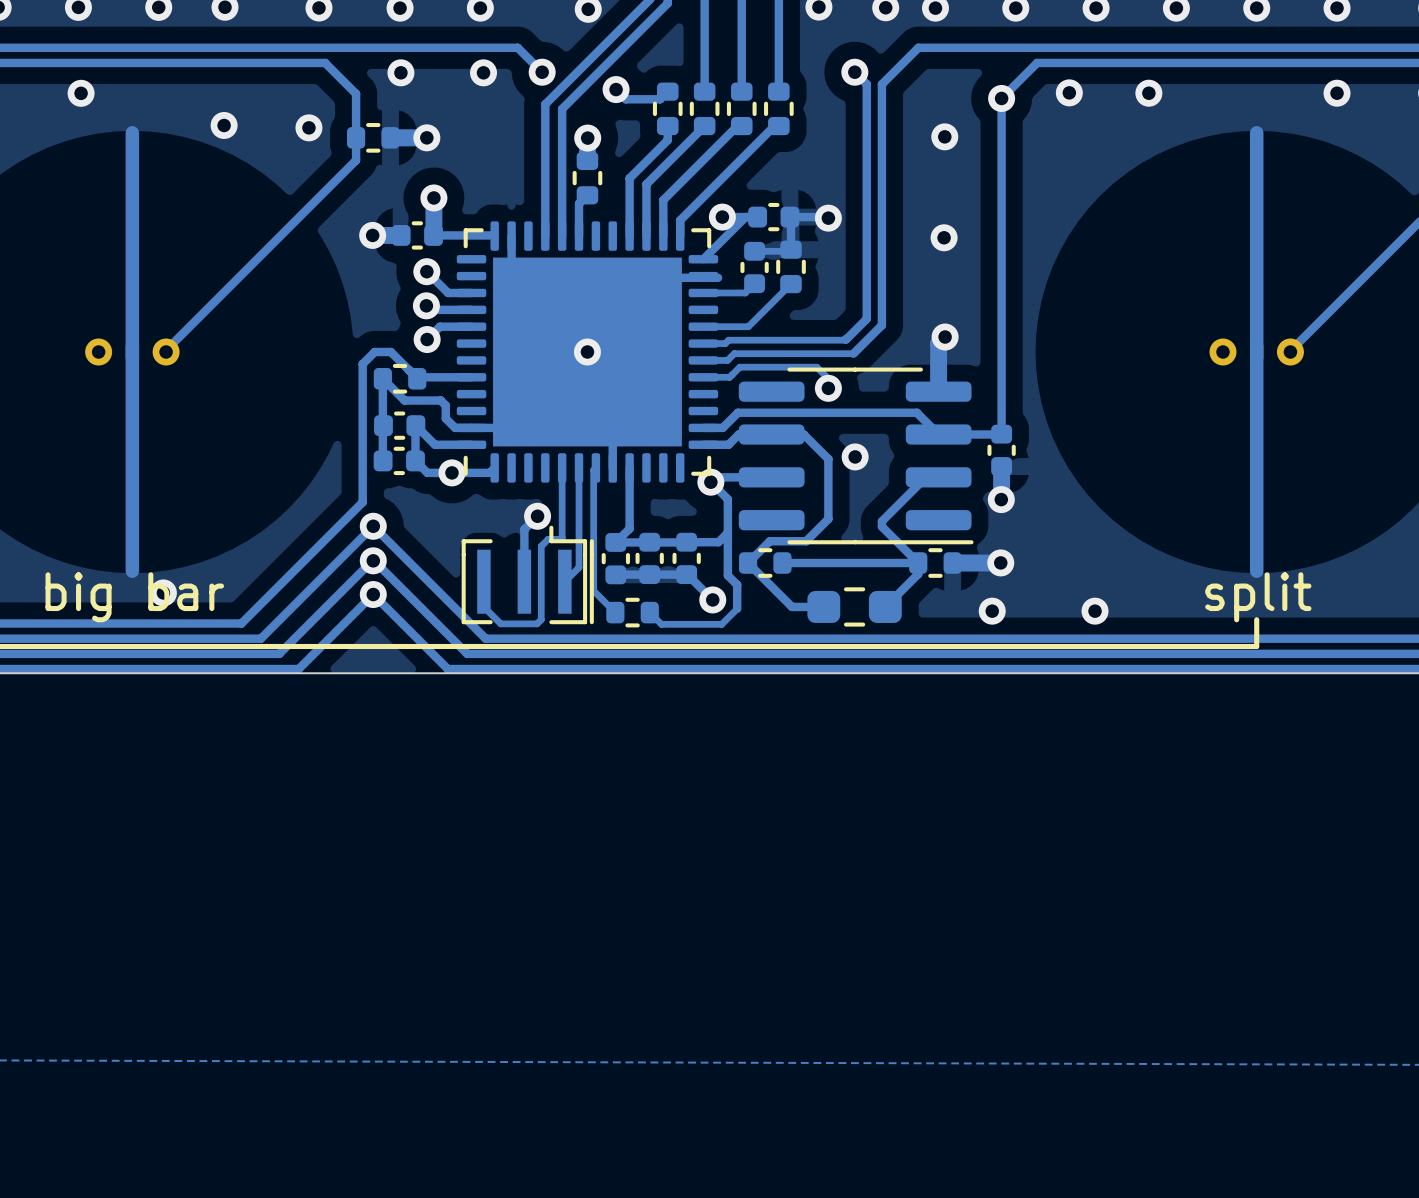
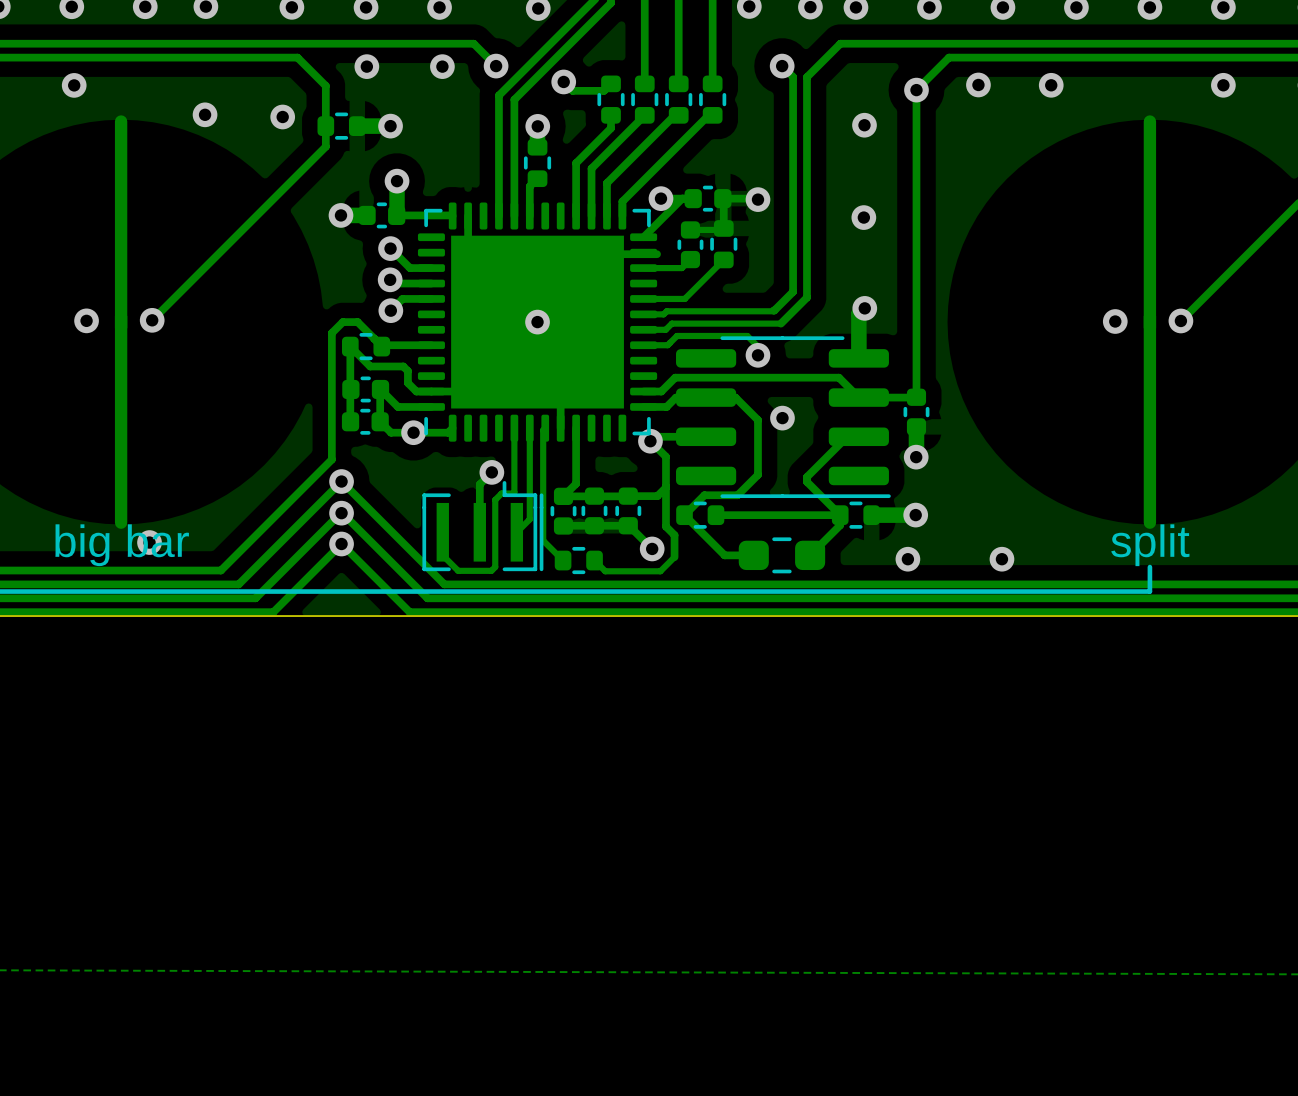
part footprint: [85, 126, 180, 578] -> [114, 115, 128, 529]
part footprint: [1209, 126, 1304, 578] -> [1143, 115, 1157, 529]
via: none -> (86, 320)
via: none -> (152, 320)
via: none -> (1180, 320)
via: none -> (1115, 321)

